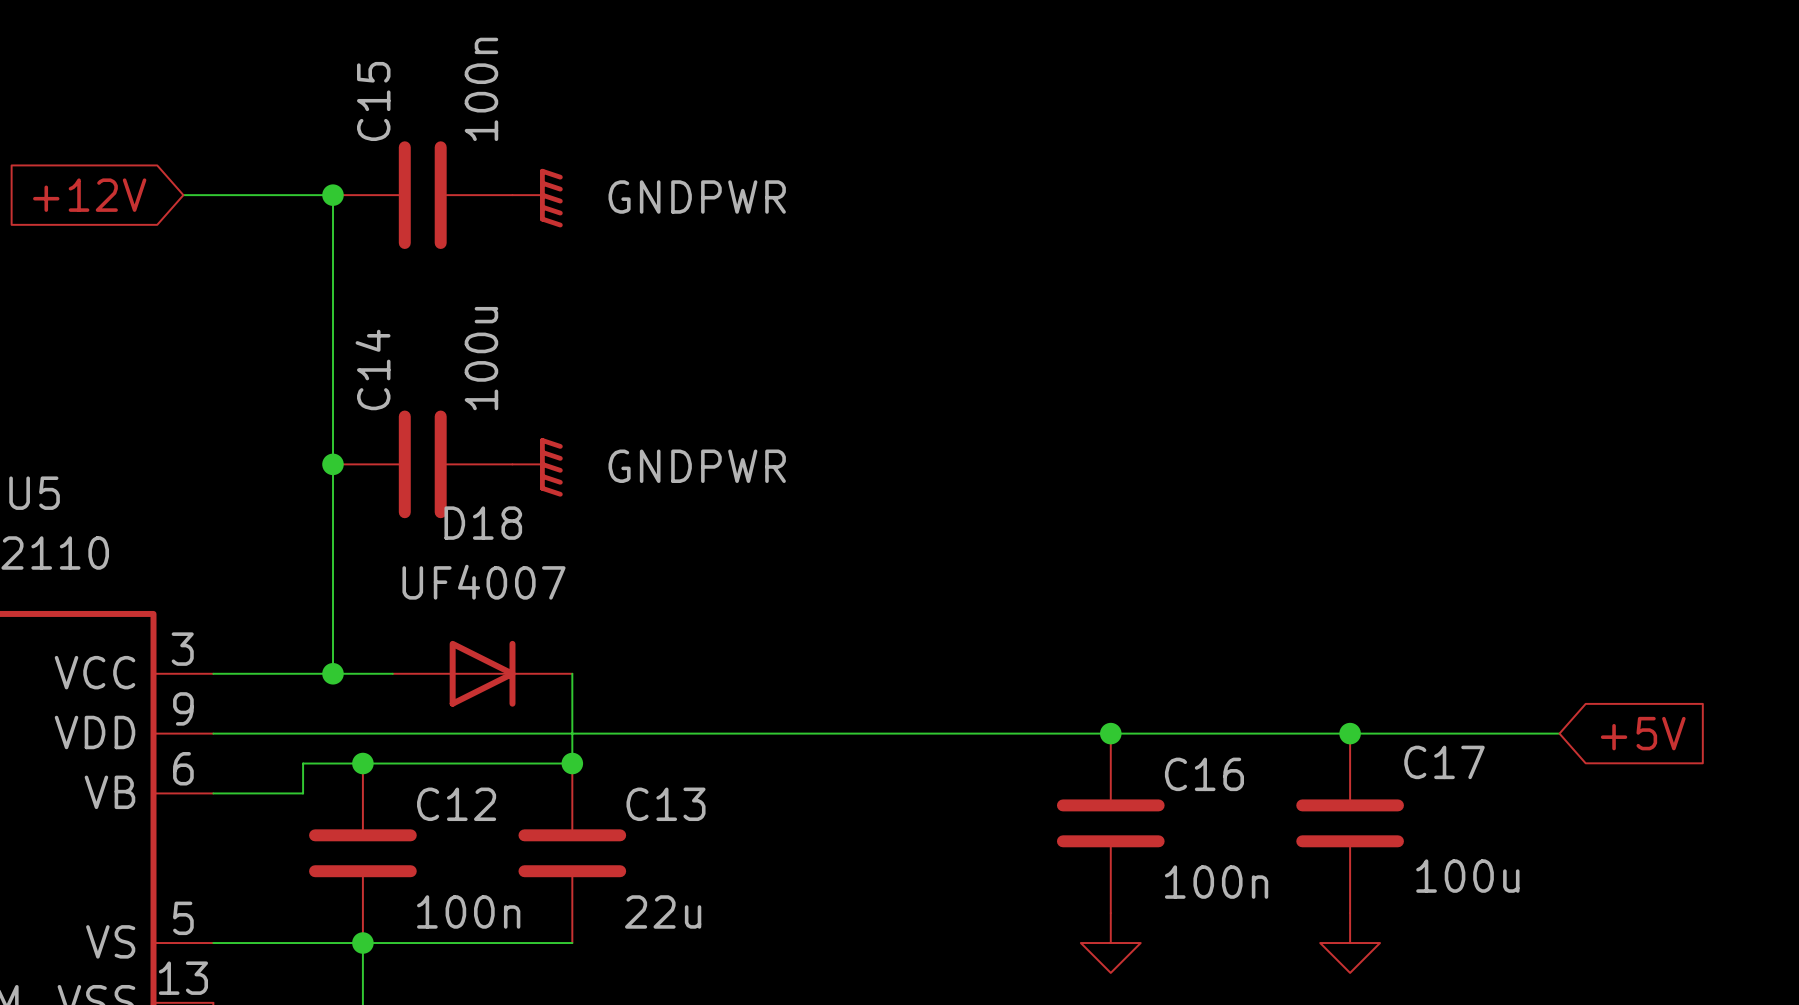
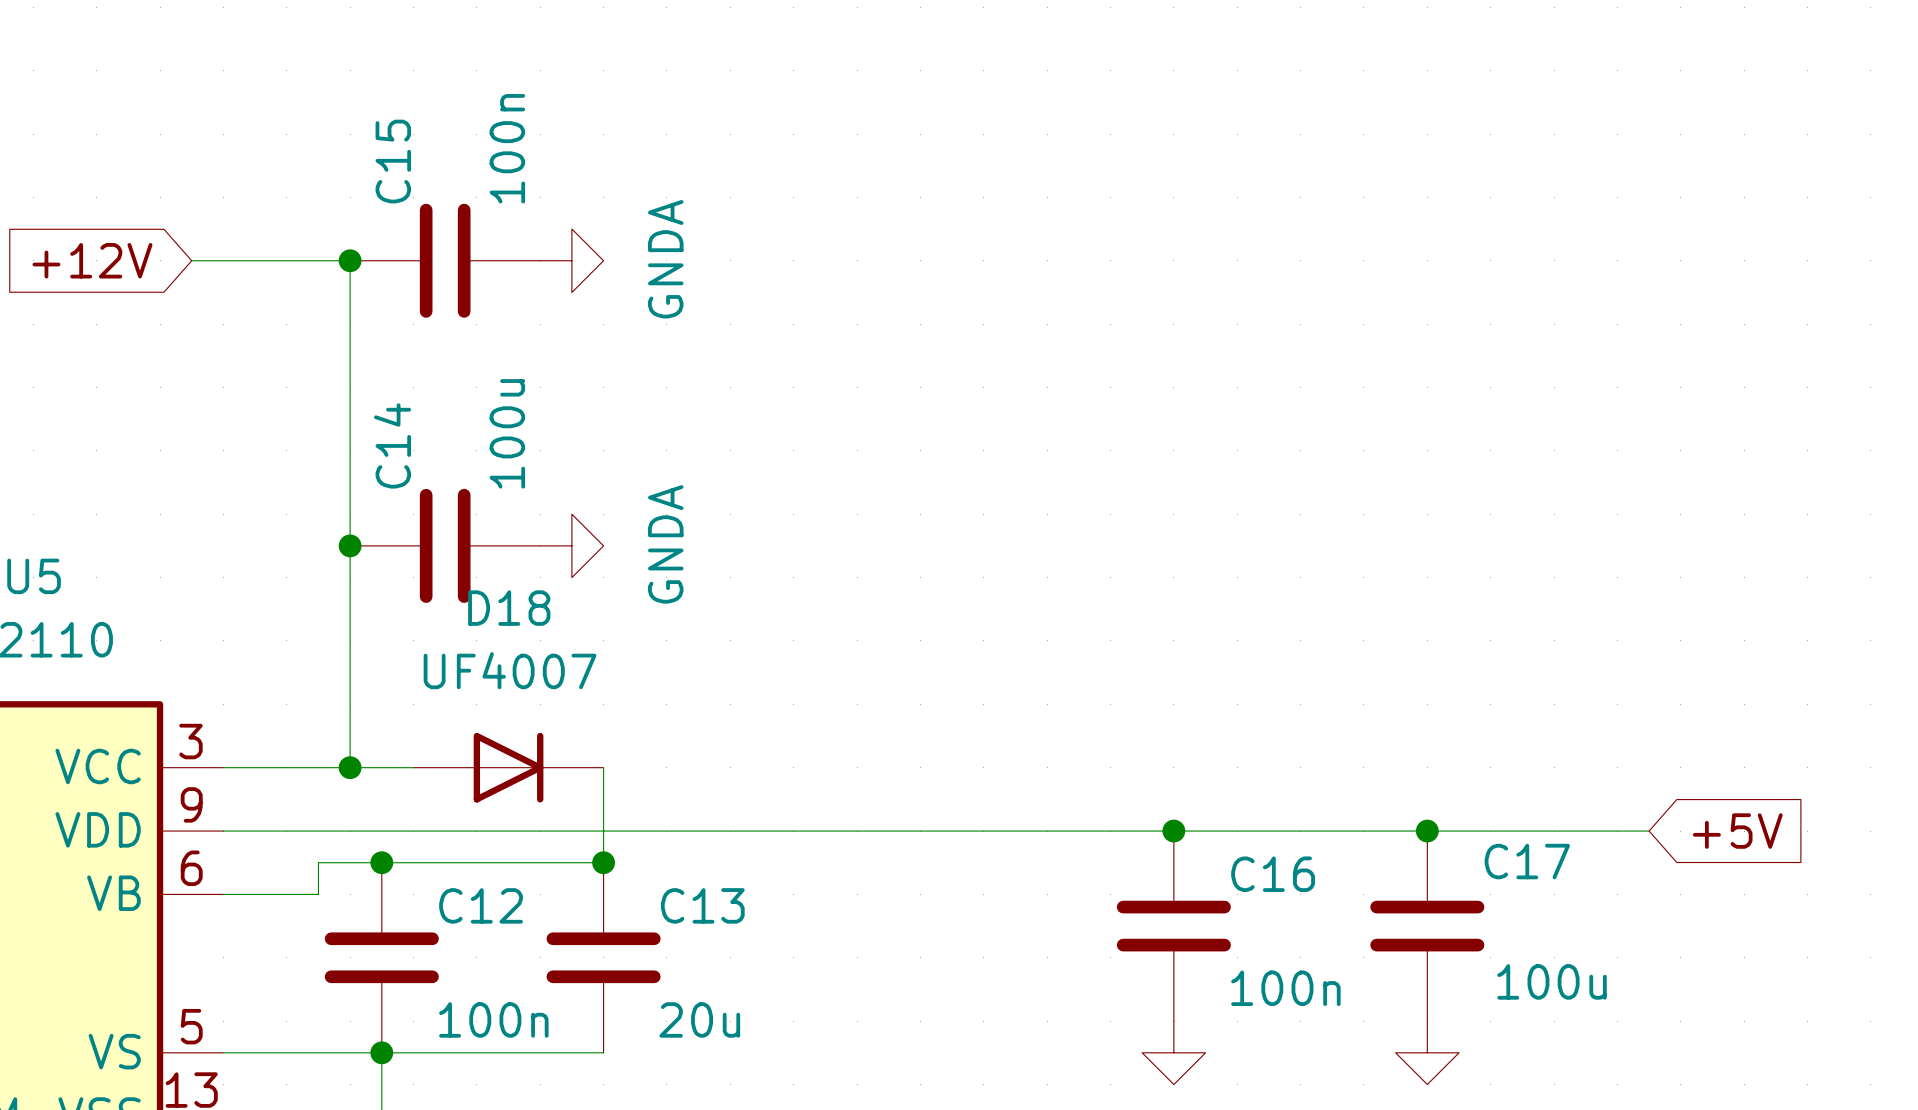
power symbol: GNDPWR (537, 198) -> GNDA (571, 260)
power symbol: GNDPWR (537, 467) -> GNDA (571, 545)
C13 value: 22u (663, 911) -> 20u (699, 1019)

